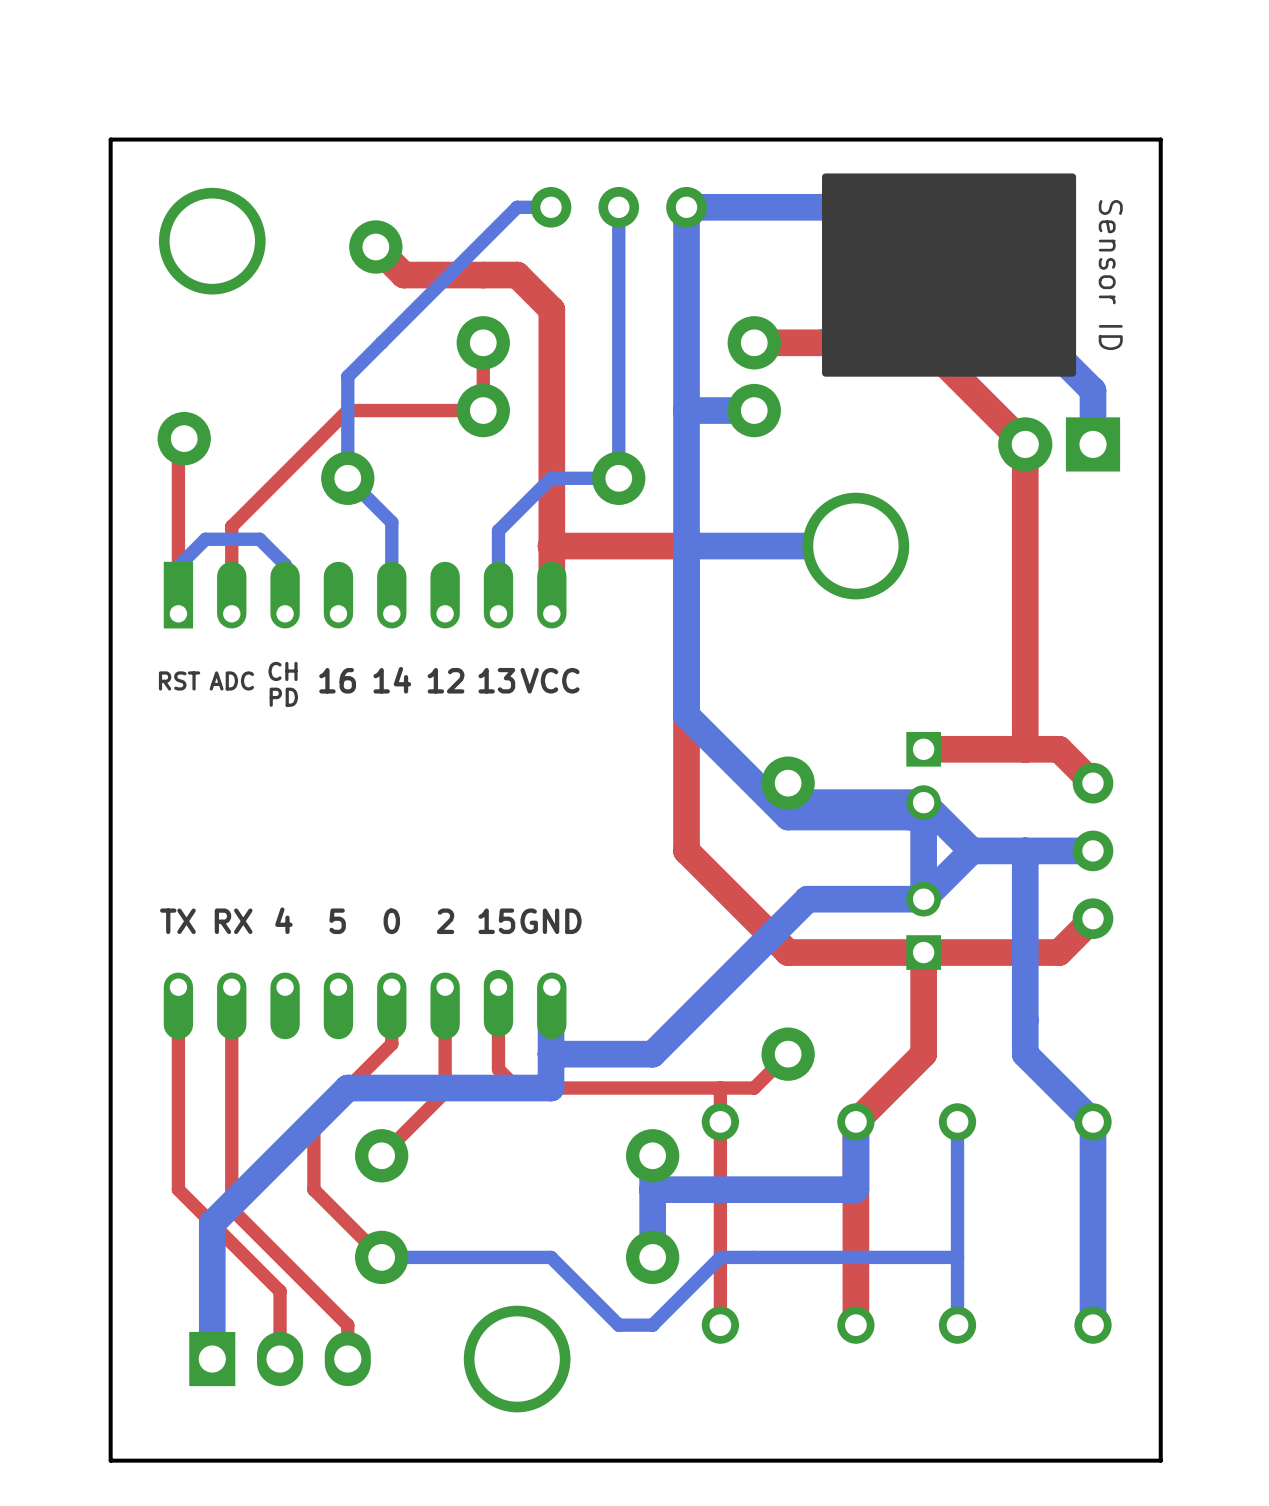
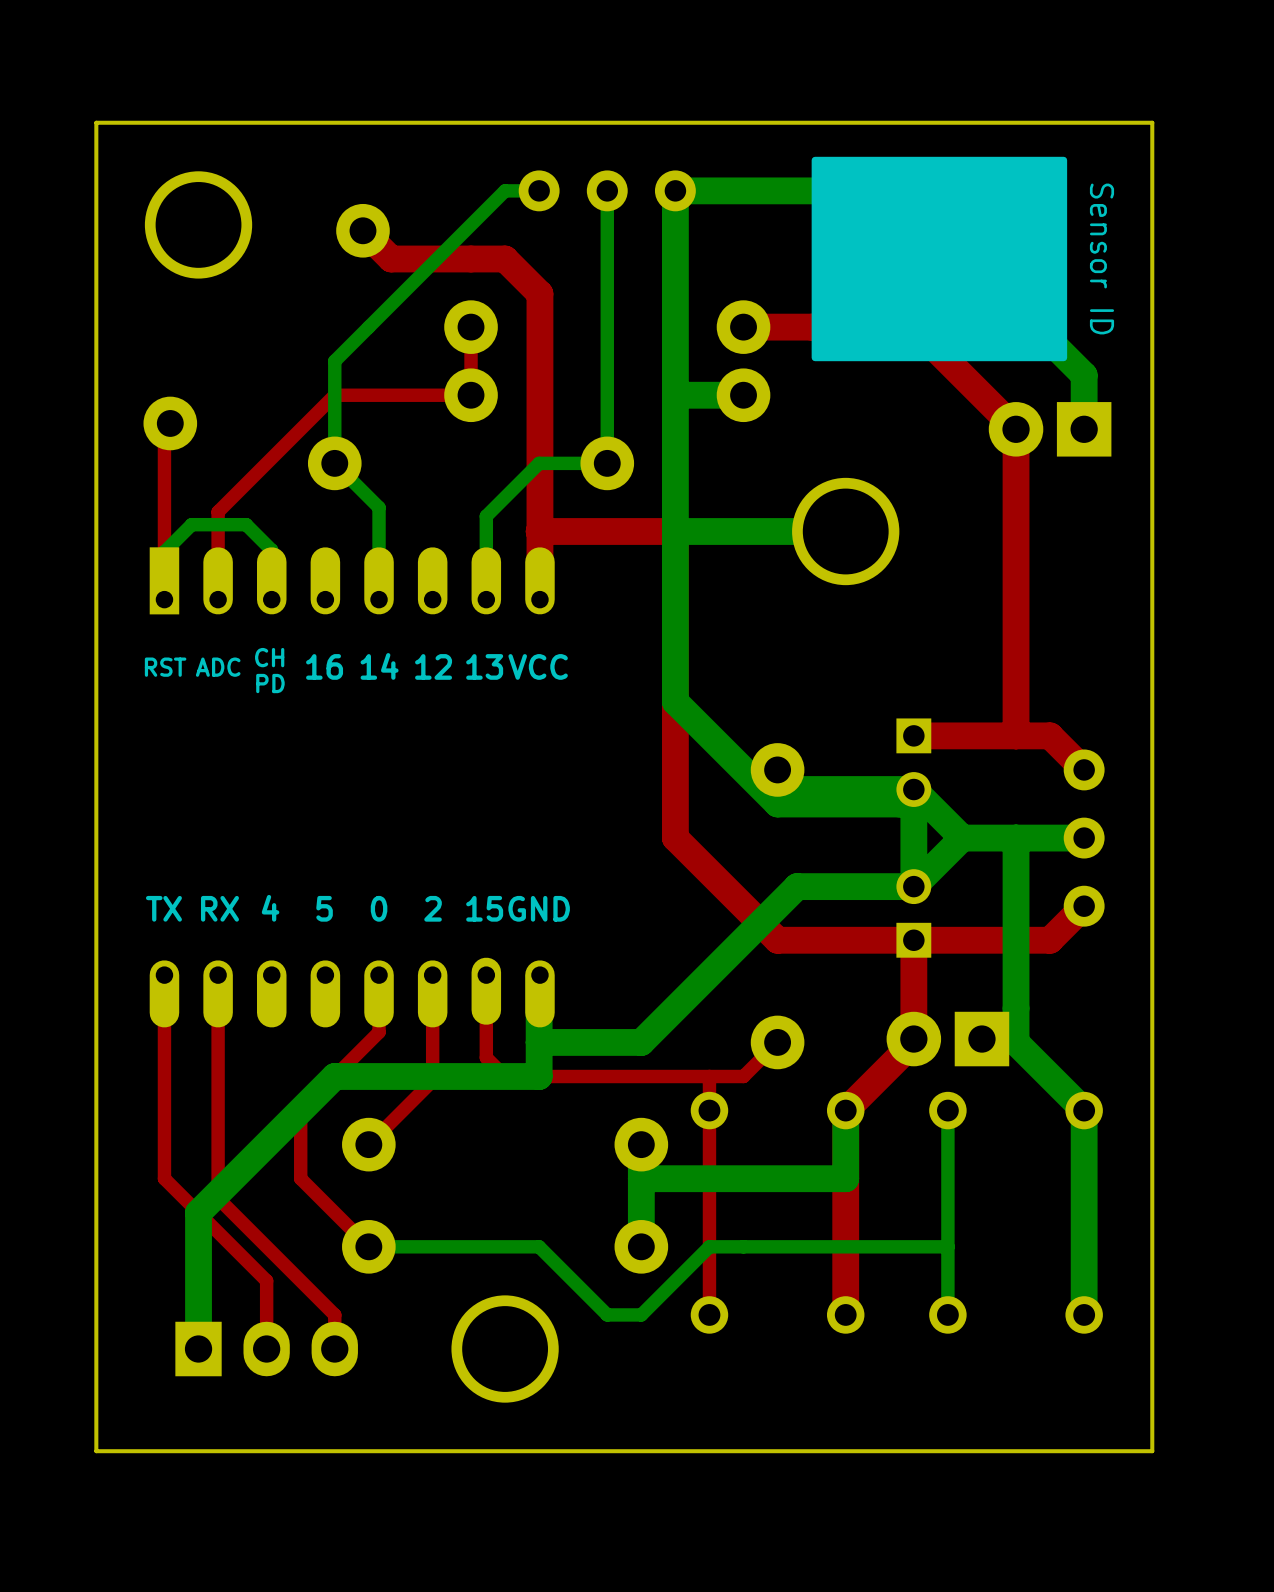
part: none -> (947, 1039)

